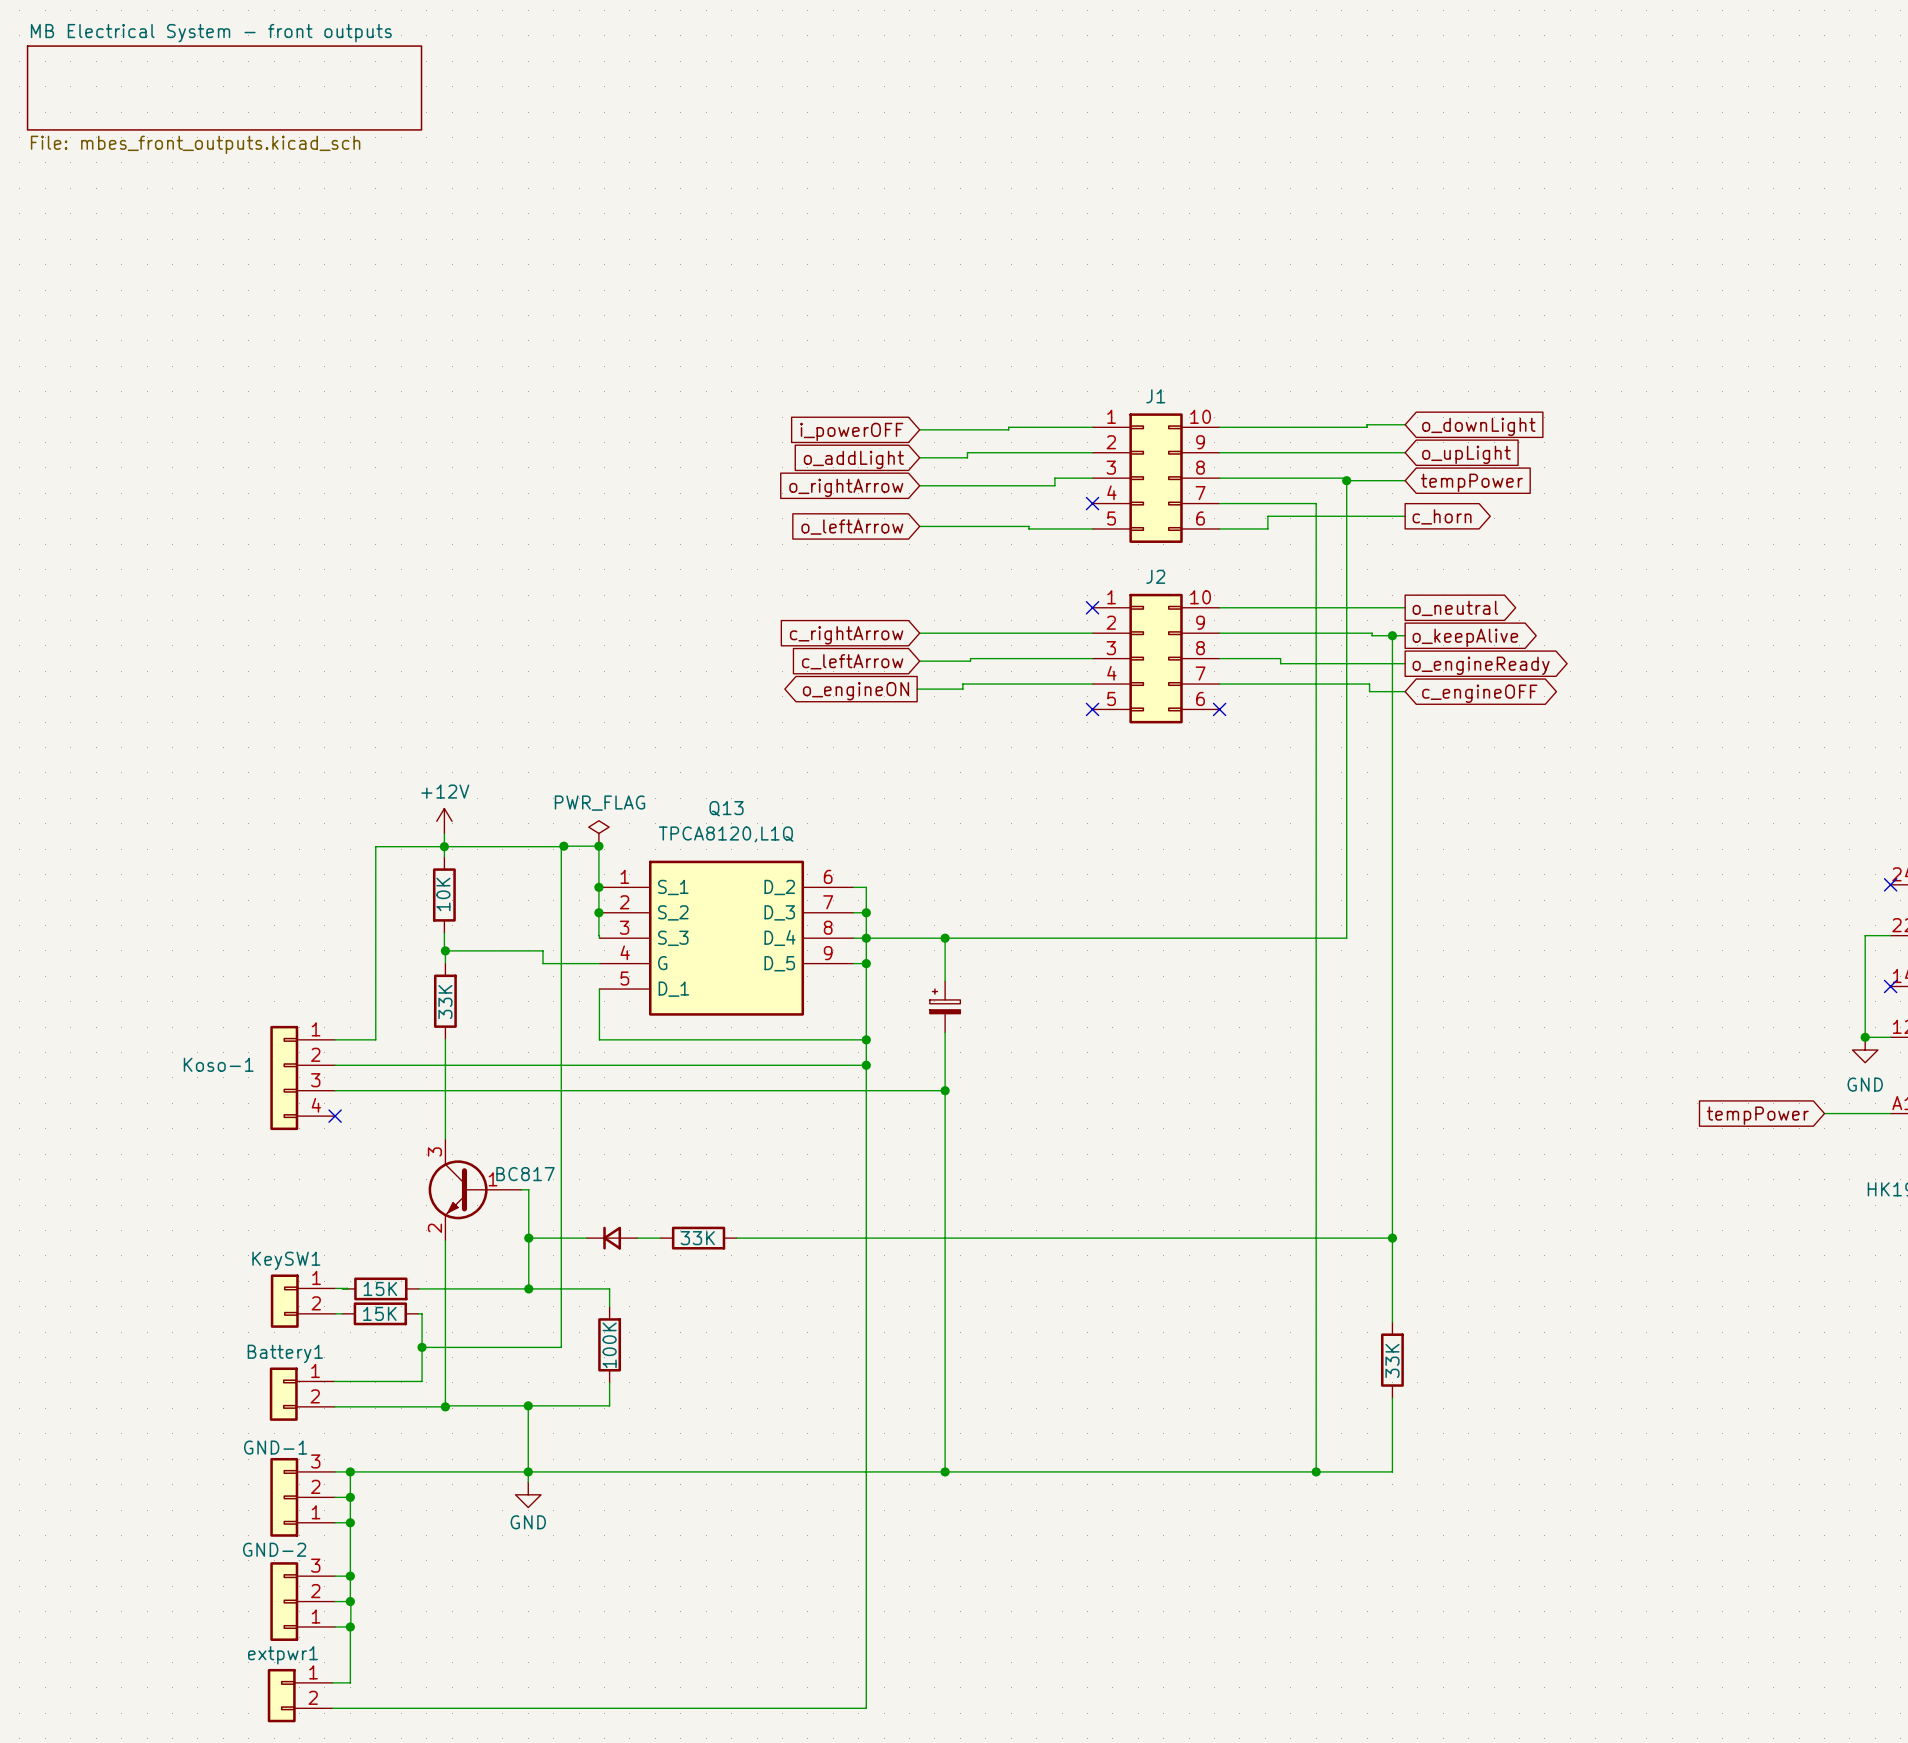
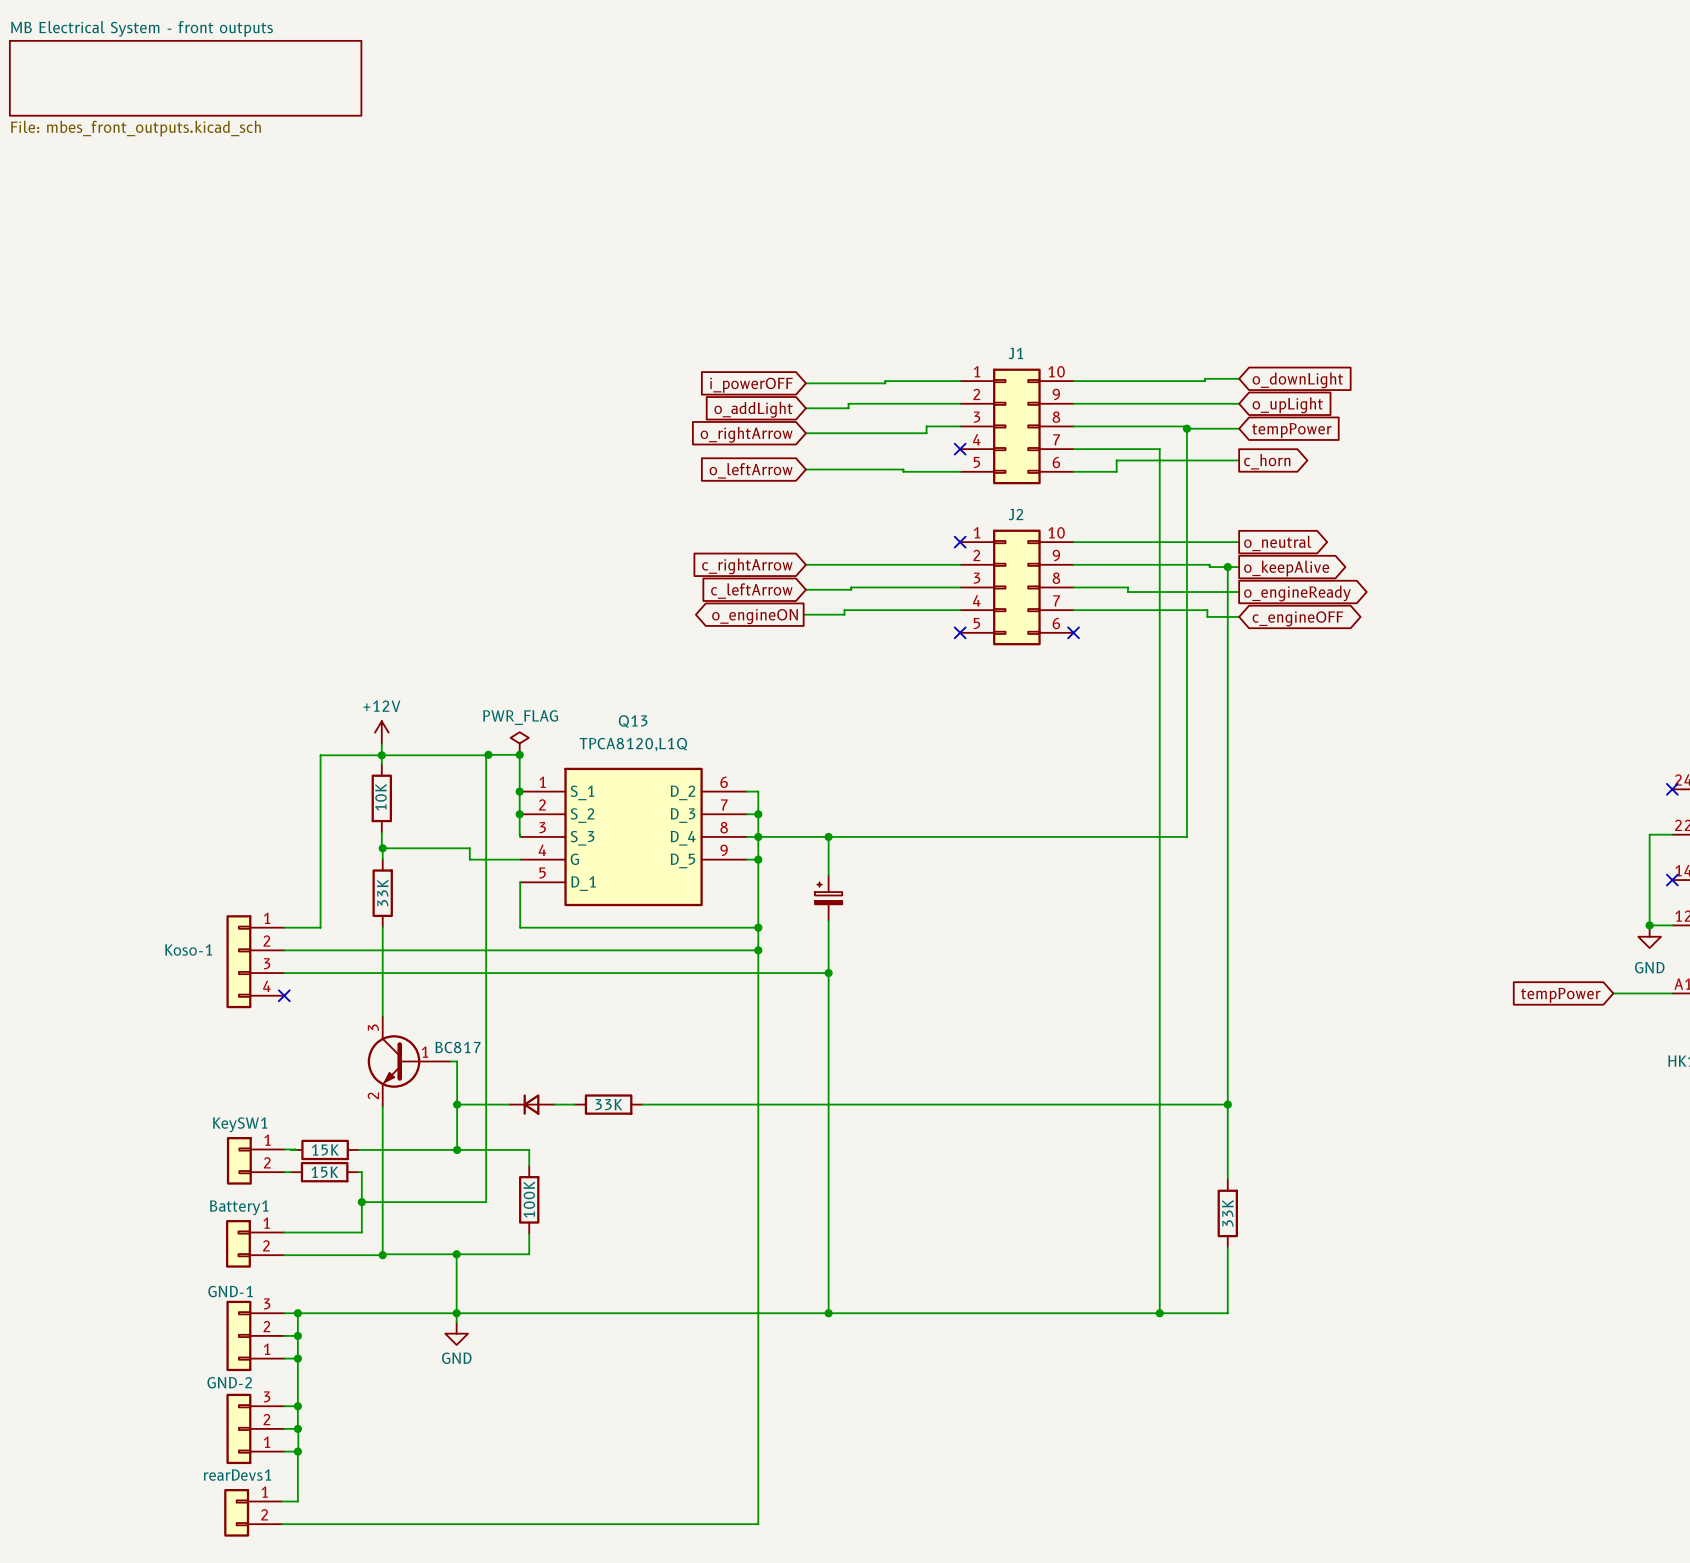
extpwr1 name: extpwr1 (282, 1655) -> rearDevs1 (237, 1475)

